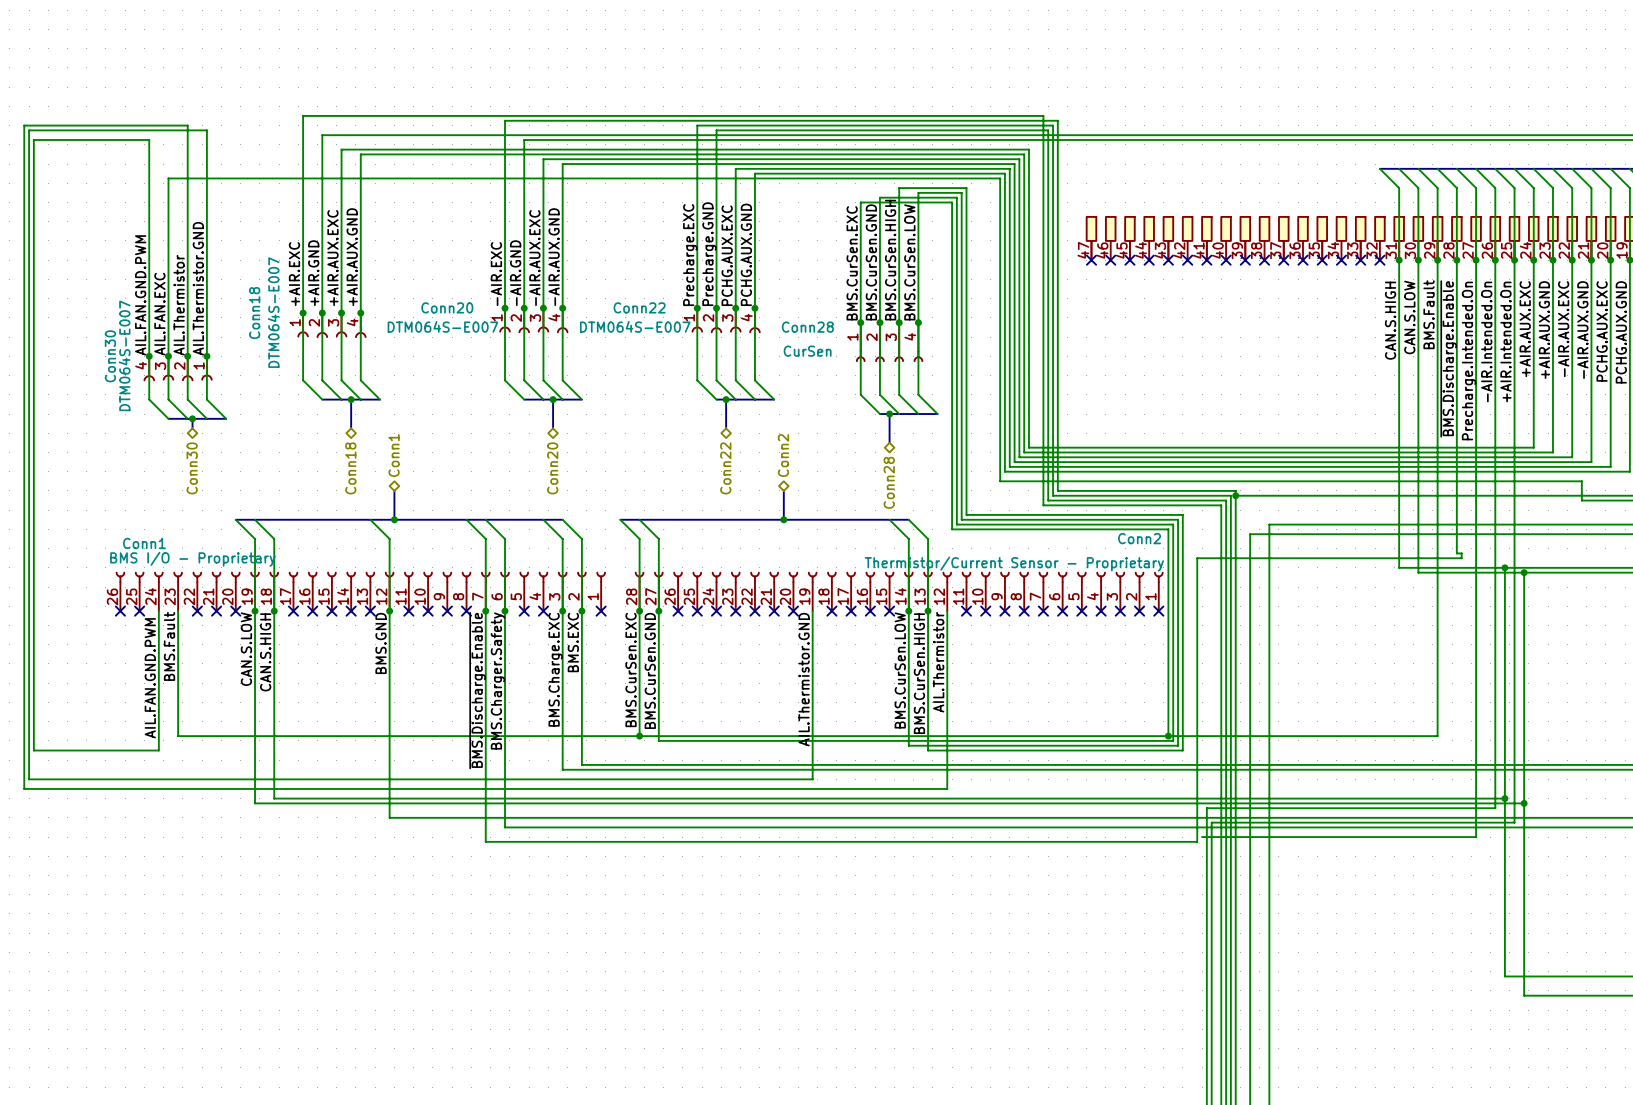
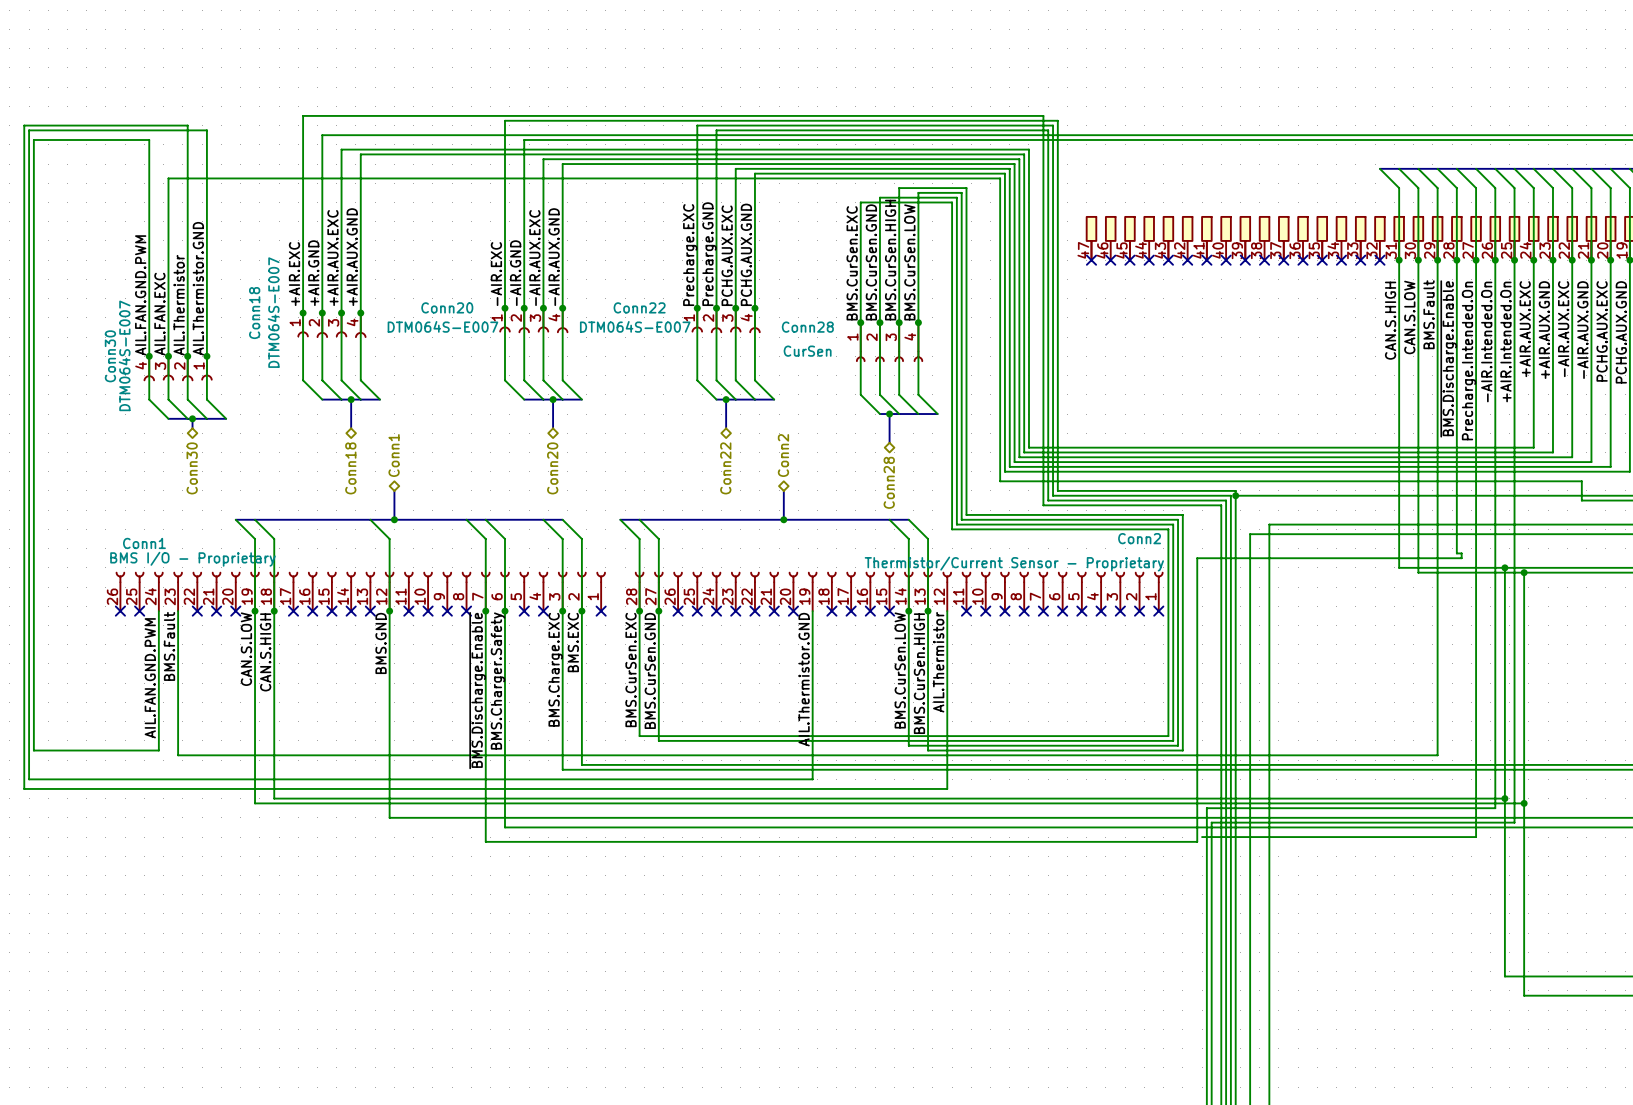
wire: (178, 736) (639, 736) -> (178, 736) (178, 755) (1437, 755) (1437, 736)
junction: (639, 736) -> none
wire: (1168, 736) (1437, 736) -> none
junction: (1168, 736) -> none

